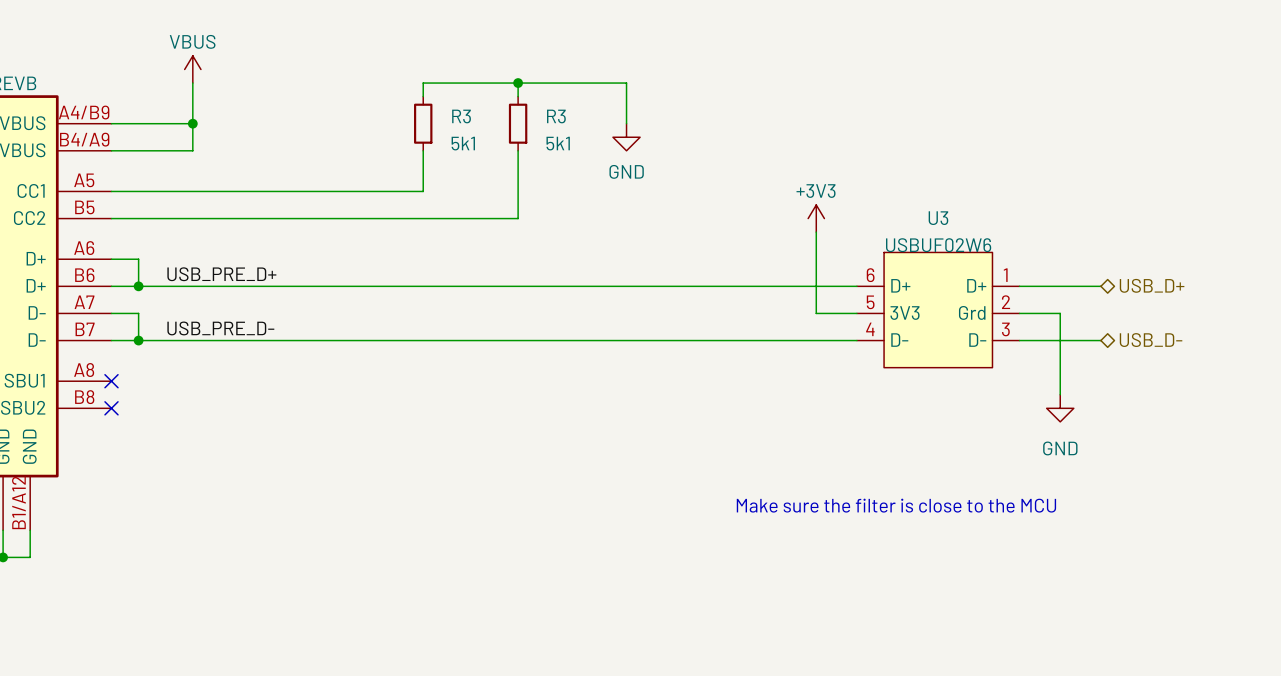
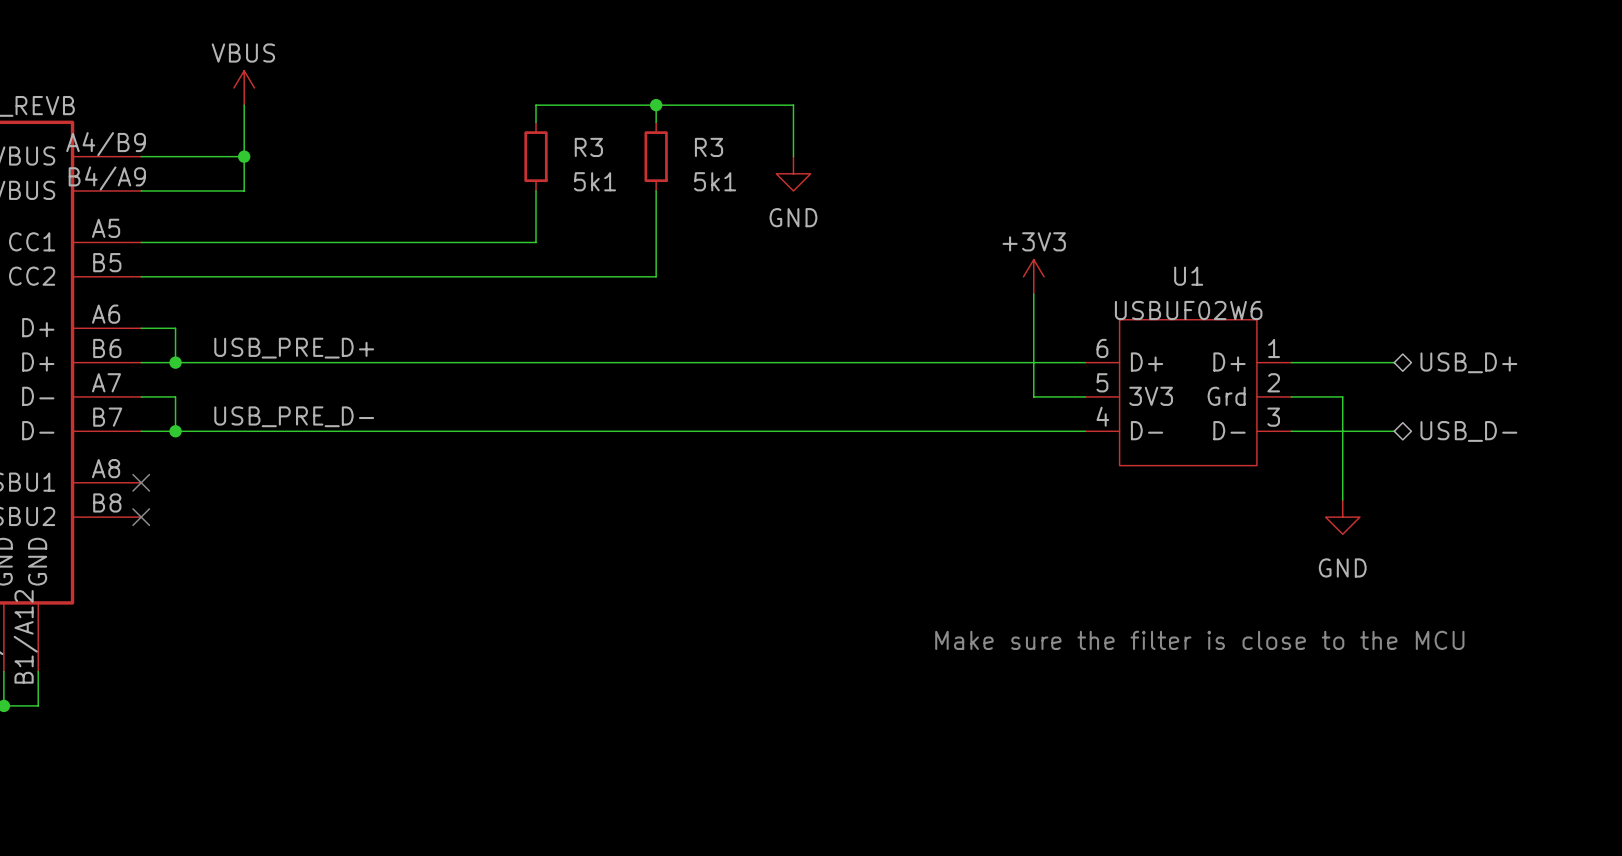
U3 name: U3 (938, 218) -> U1 (1188, 276)

